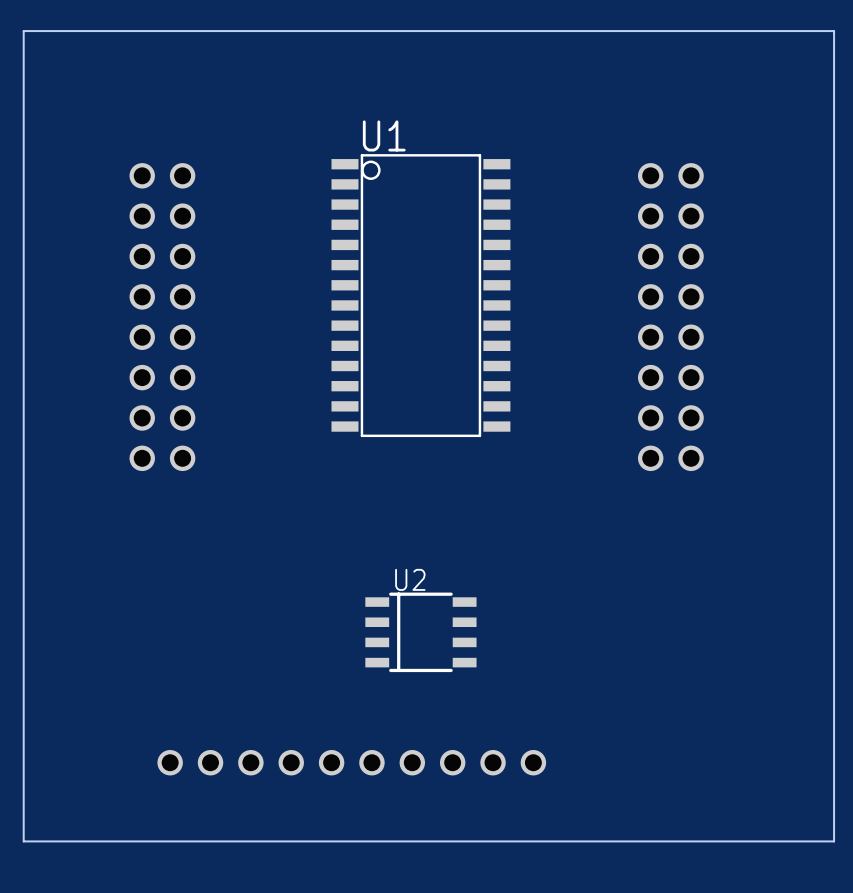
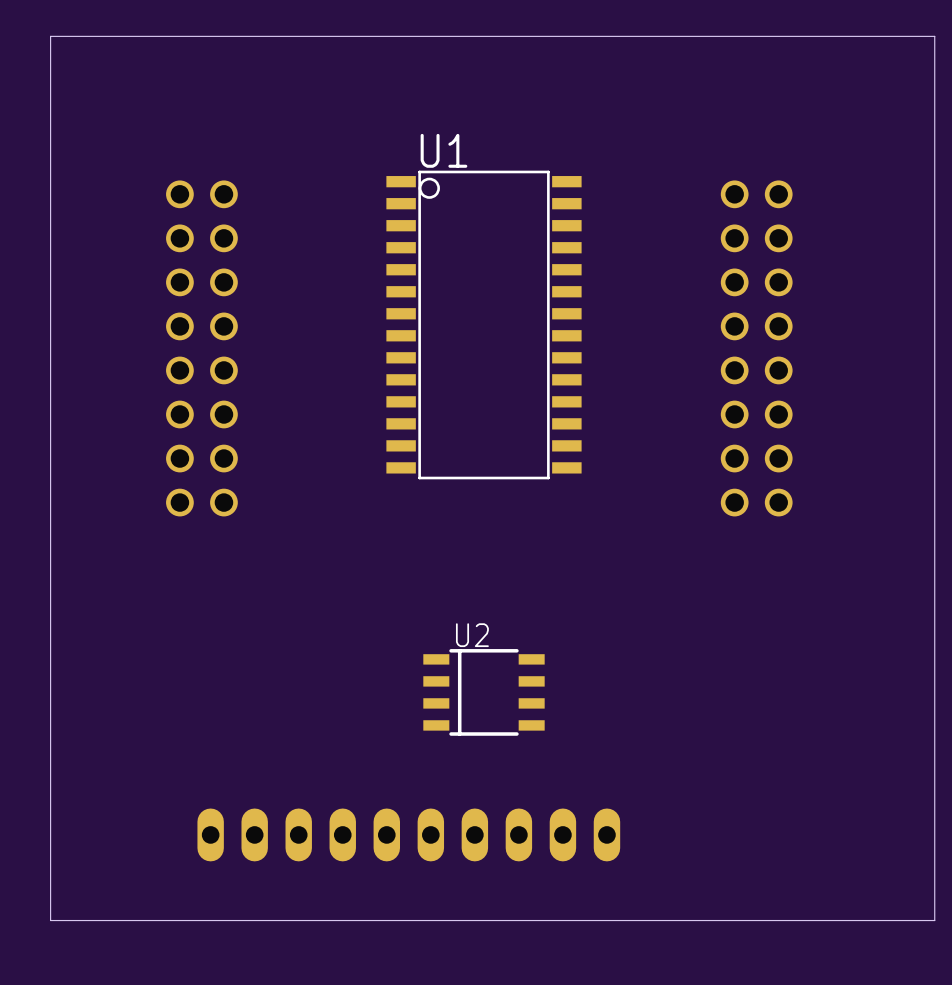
part footprint: [157, 750, 547, 776] -> [197, 808, 621, 862]

